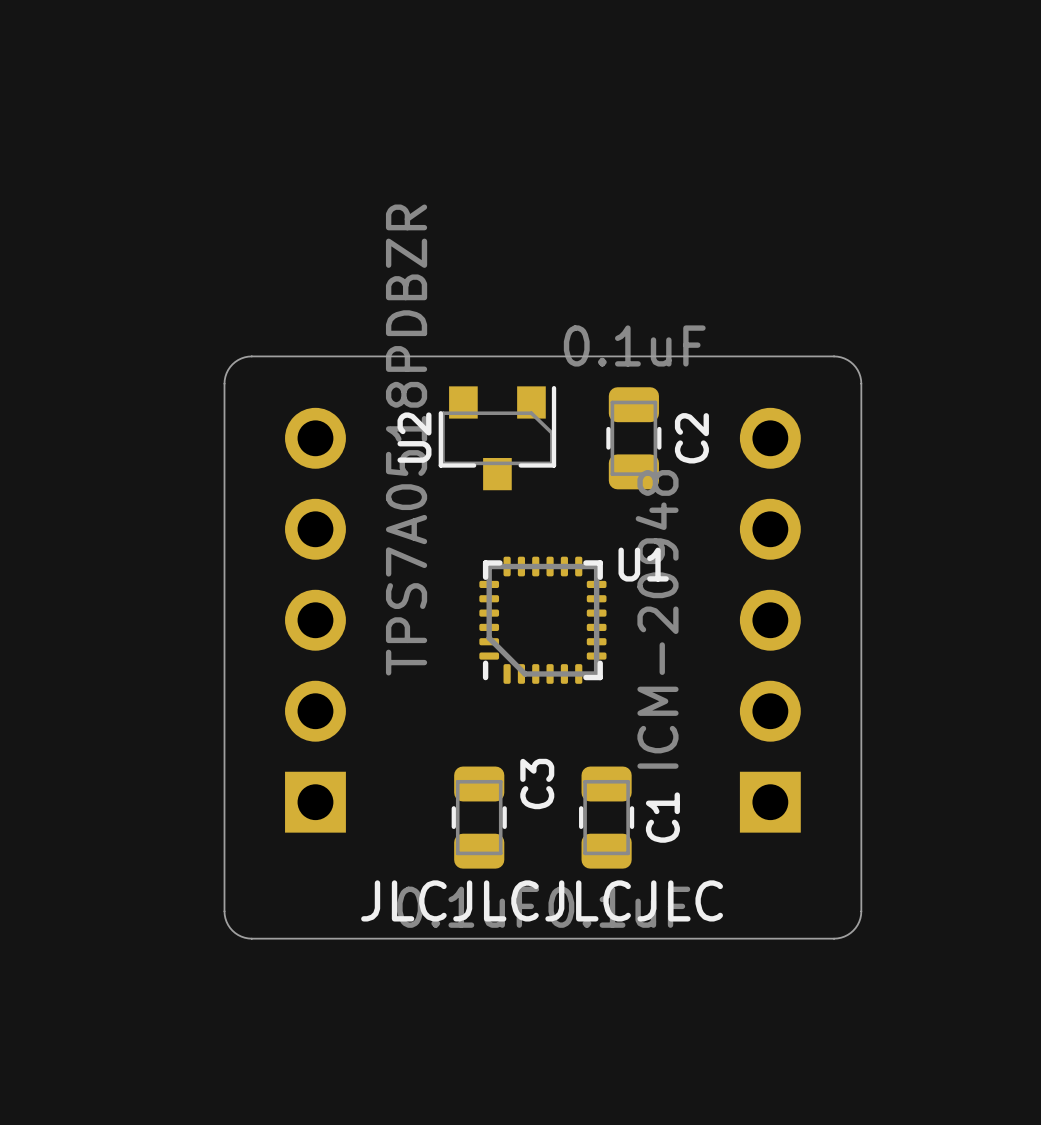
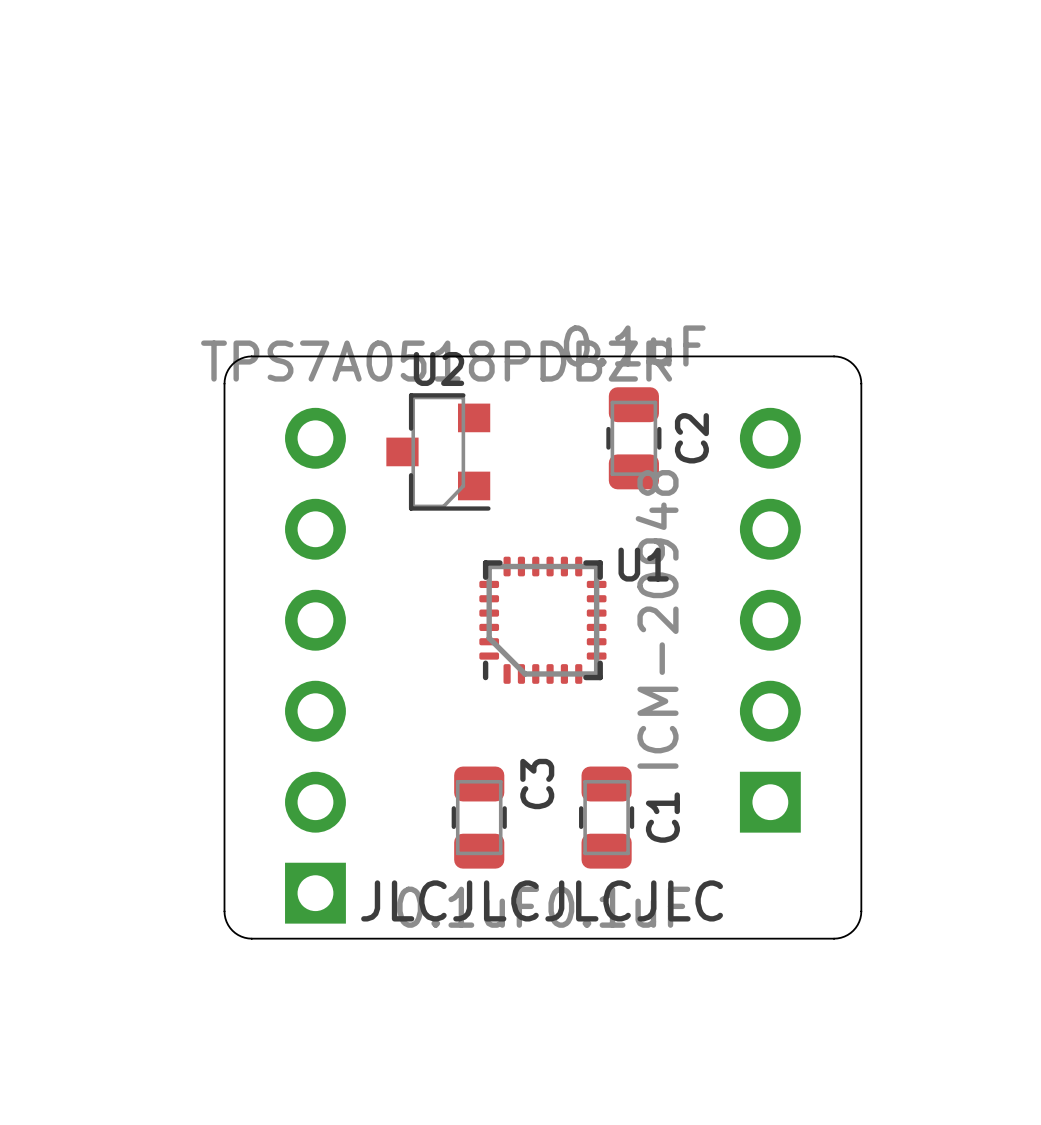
U2 rotation: 0° (497, 438) -> 90° clockwise (438, 451)
part: (315, 620) -> none
part: none -> (315, 665)

